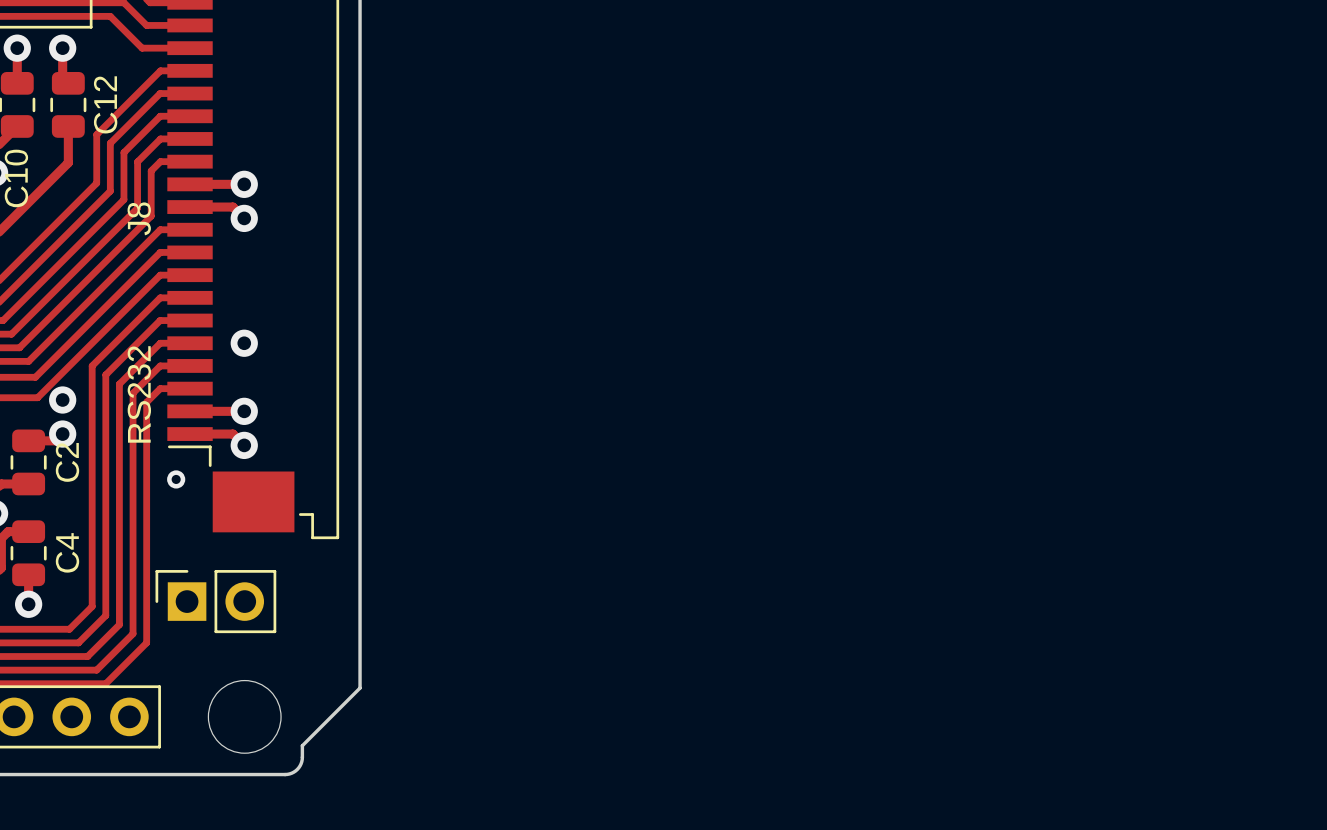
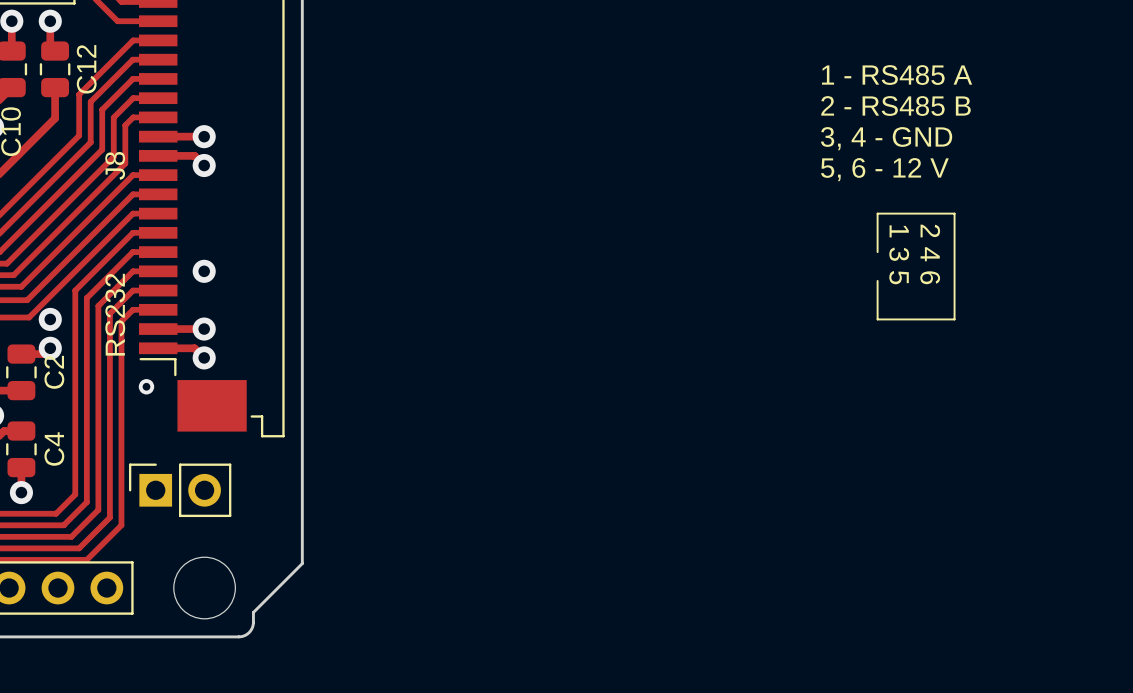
text: none -> 1 - RS485 A (897, 75)
text: none -> 2 - RS485 B (896, 106)
text: none -> 3, 4 - GND (886, 138)
text: none -> 5, 6 - 12 V (884, 169)
line: none -> (877, 252) (877, 213) (954, 213) (954, 319) (877, 319) (877, 280)
text: none -> 1 3 5 (899, 254)
text: none -> 2 4 6 (930, 254)

